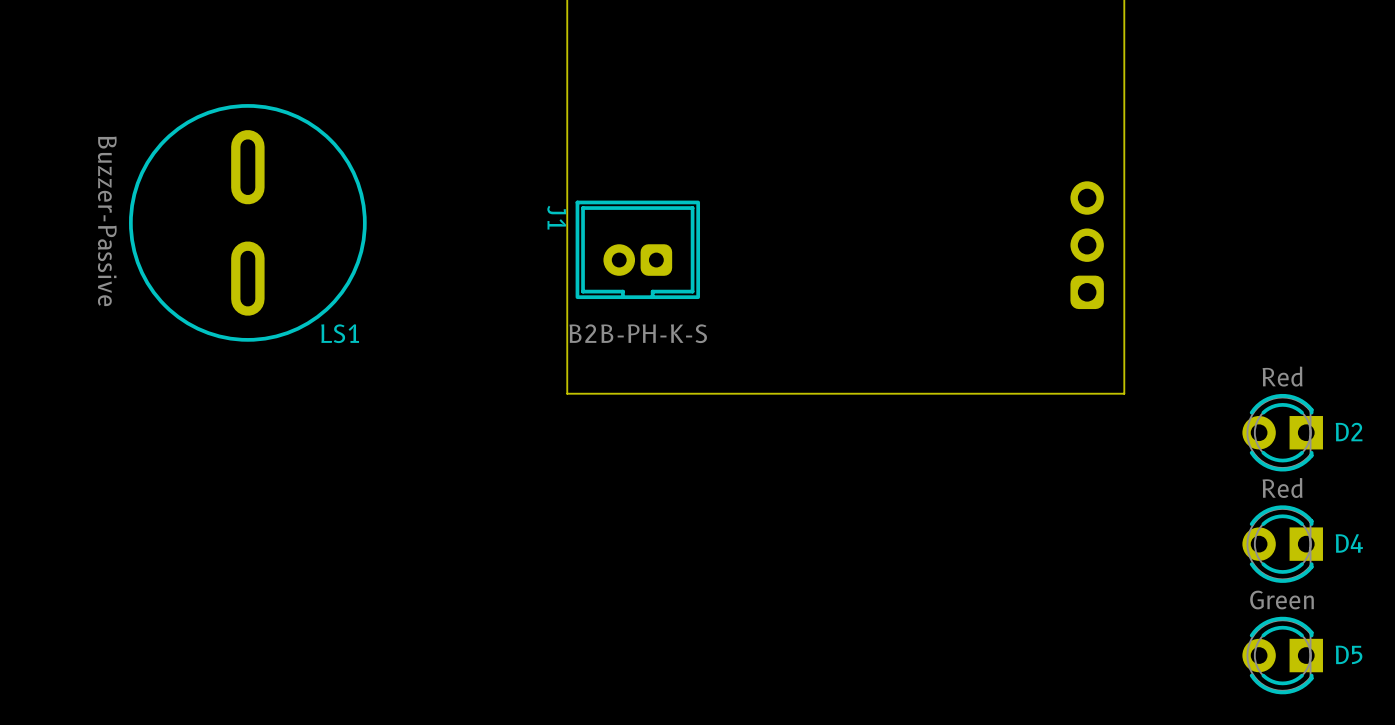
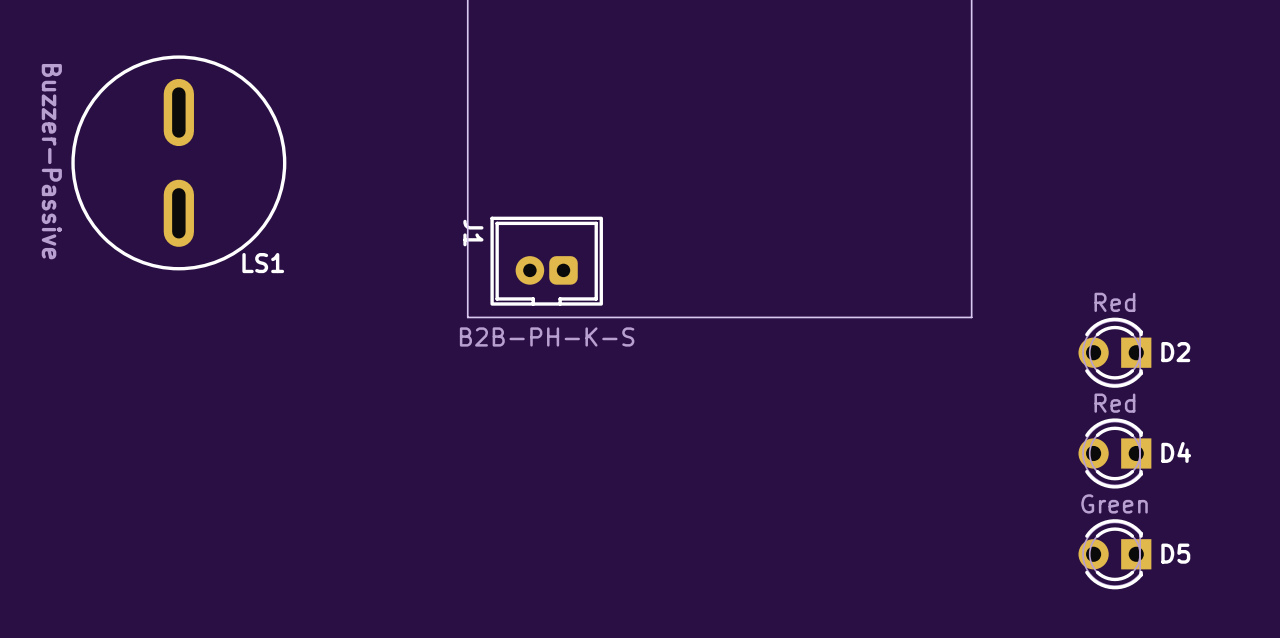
part: (1087, 245) -> none
J1 position: (637, 249) -> (546, 261)

